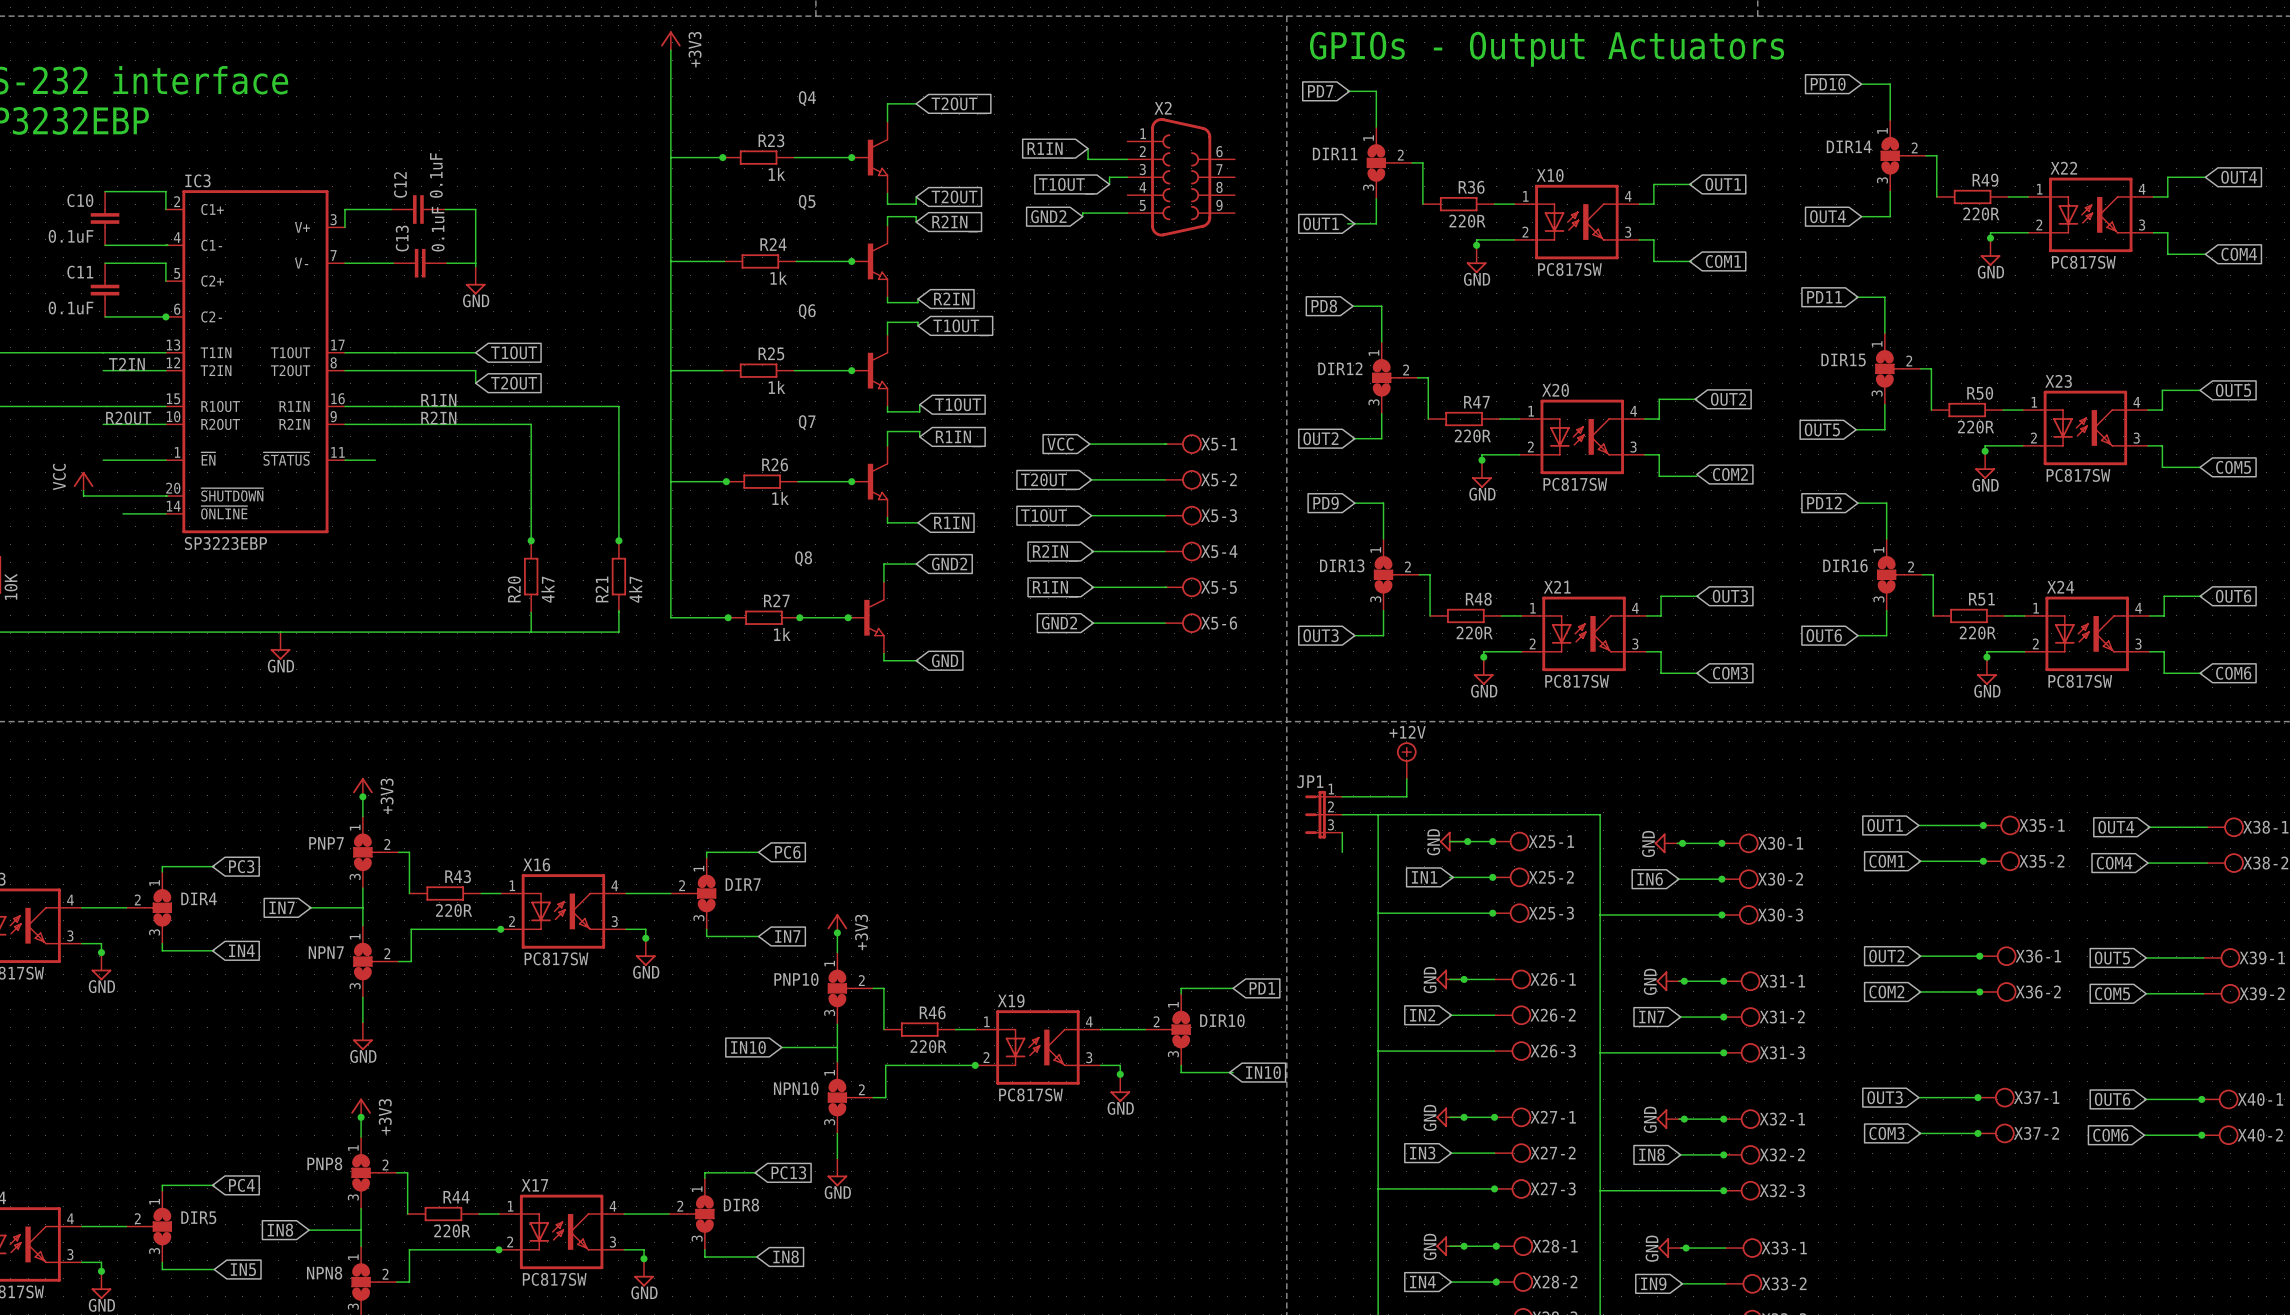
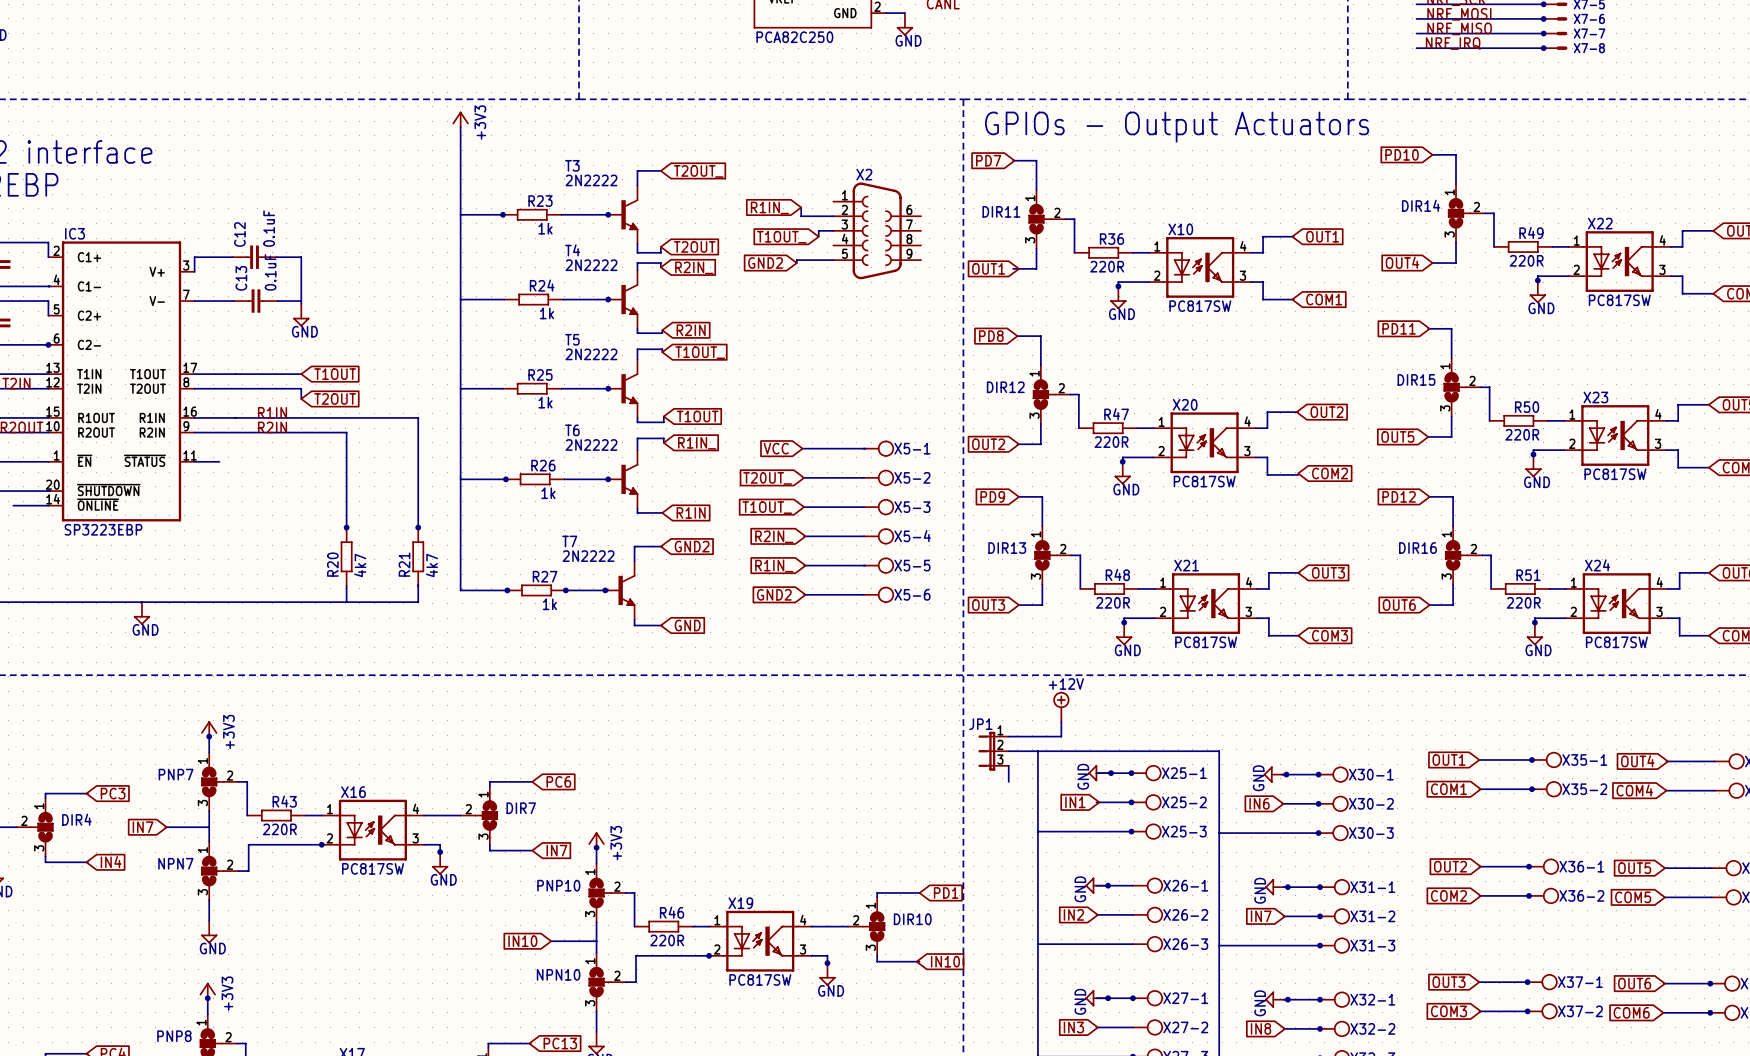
Q4: (869, 157) -> none
T3: none -> 2N2222 (623, 214)
Q5: (869, 261) -> none
T4: none -> 2N2222 (623, 299)
Q6: (869, 370) -> none
T5: none -> 2N2222 (623, 388)
Q7: (869, 481) -> none
T6: none -> 2N2222 (623, 479)
Q8: (866, 617) -> none
T7: none -> 2N2222 (620, 590)

